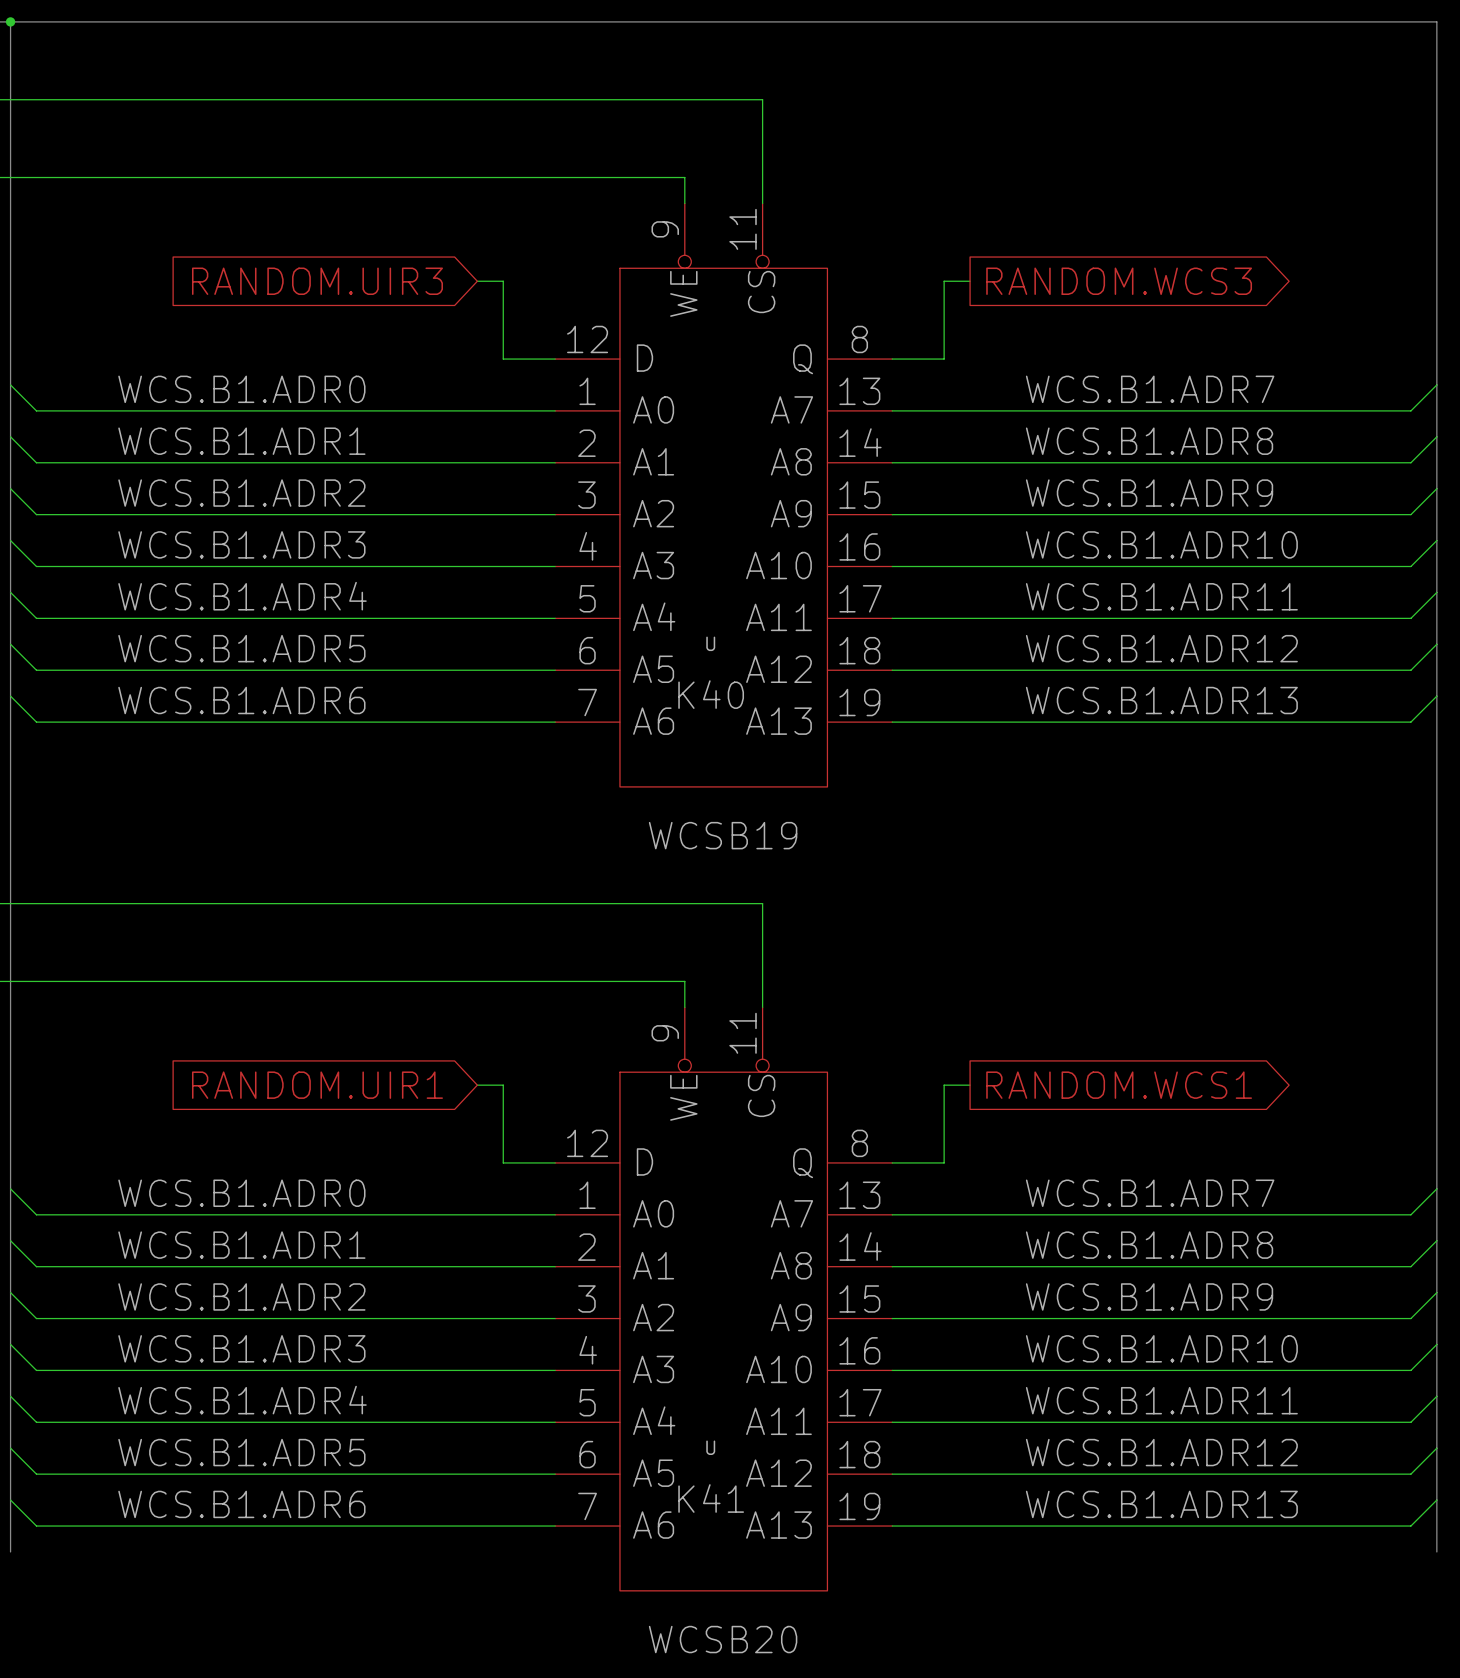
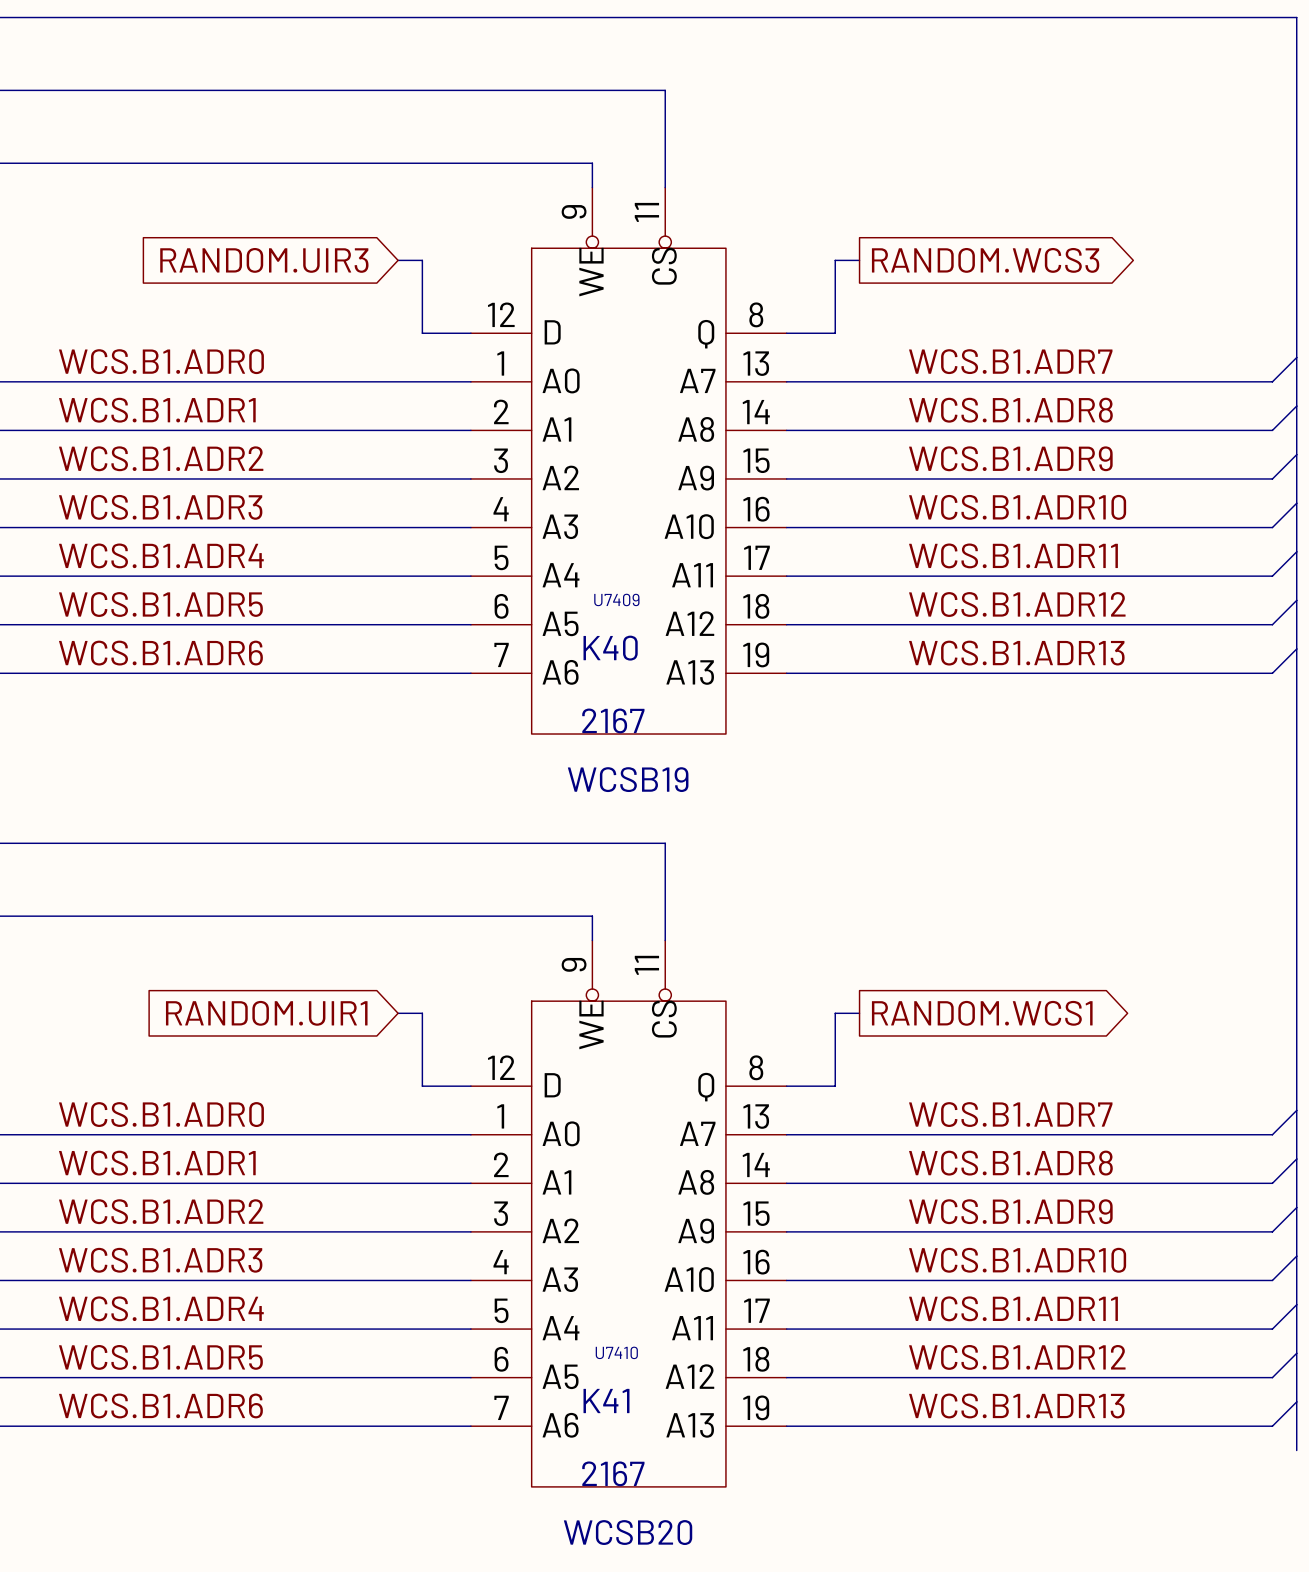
U name: U (710, 643) -> U7409 (616, 599)
U value: none -> 2167 (613, 720)
U name: U (710, 1447) -> U7410 (616, 1352)
U value: none -> 2167 (613, 1473)

